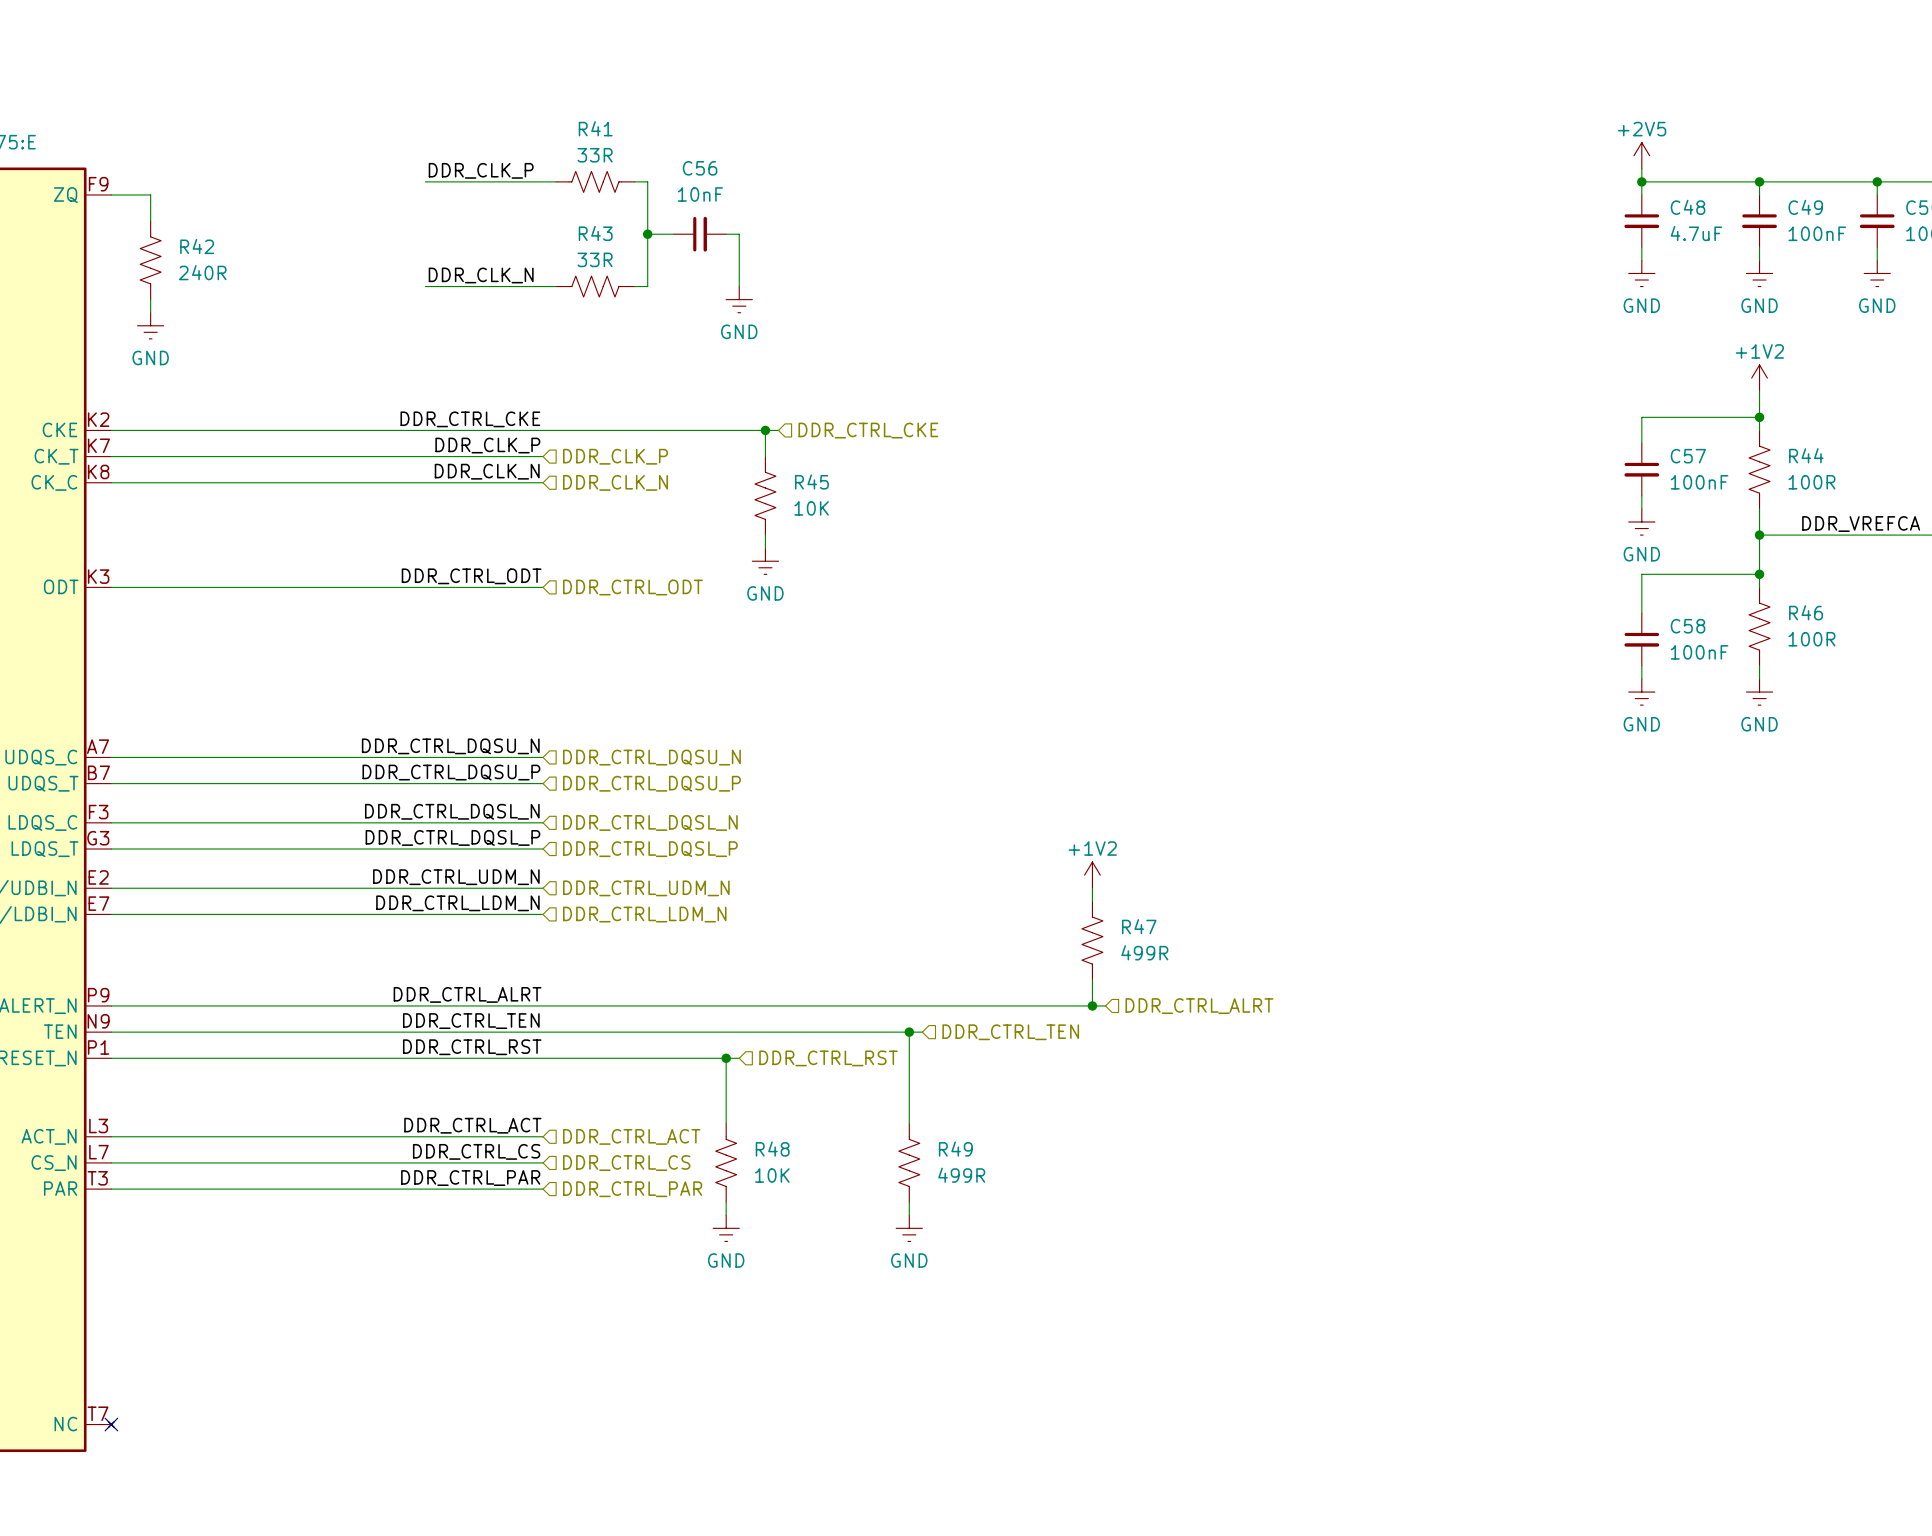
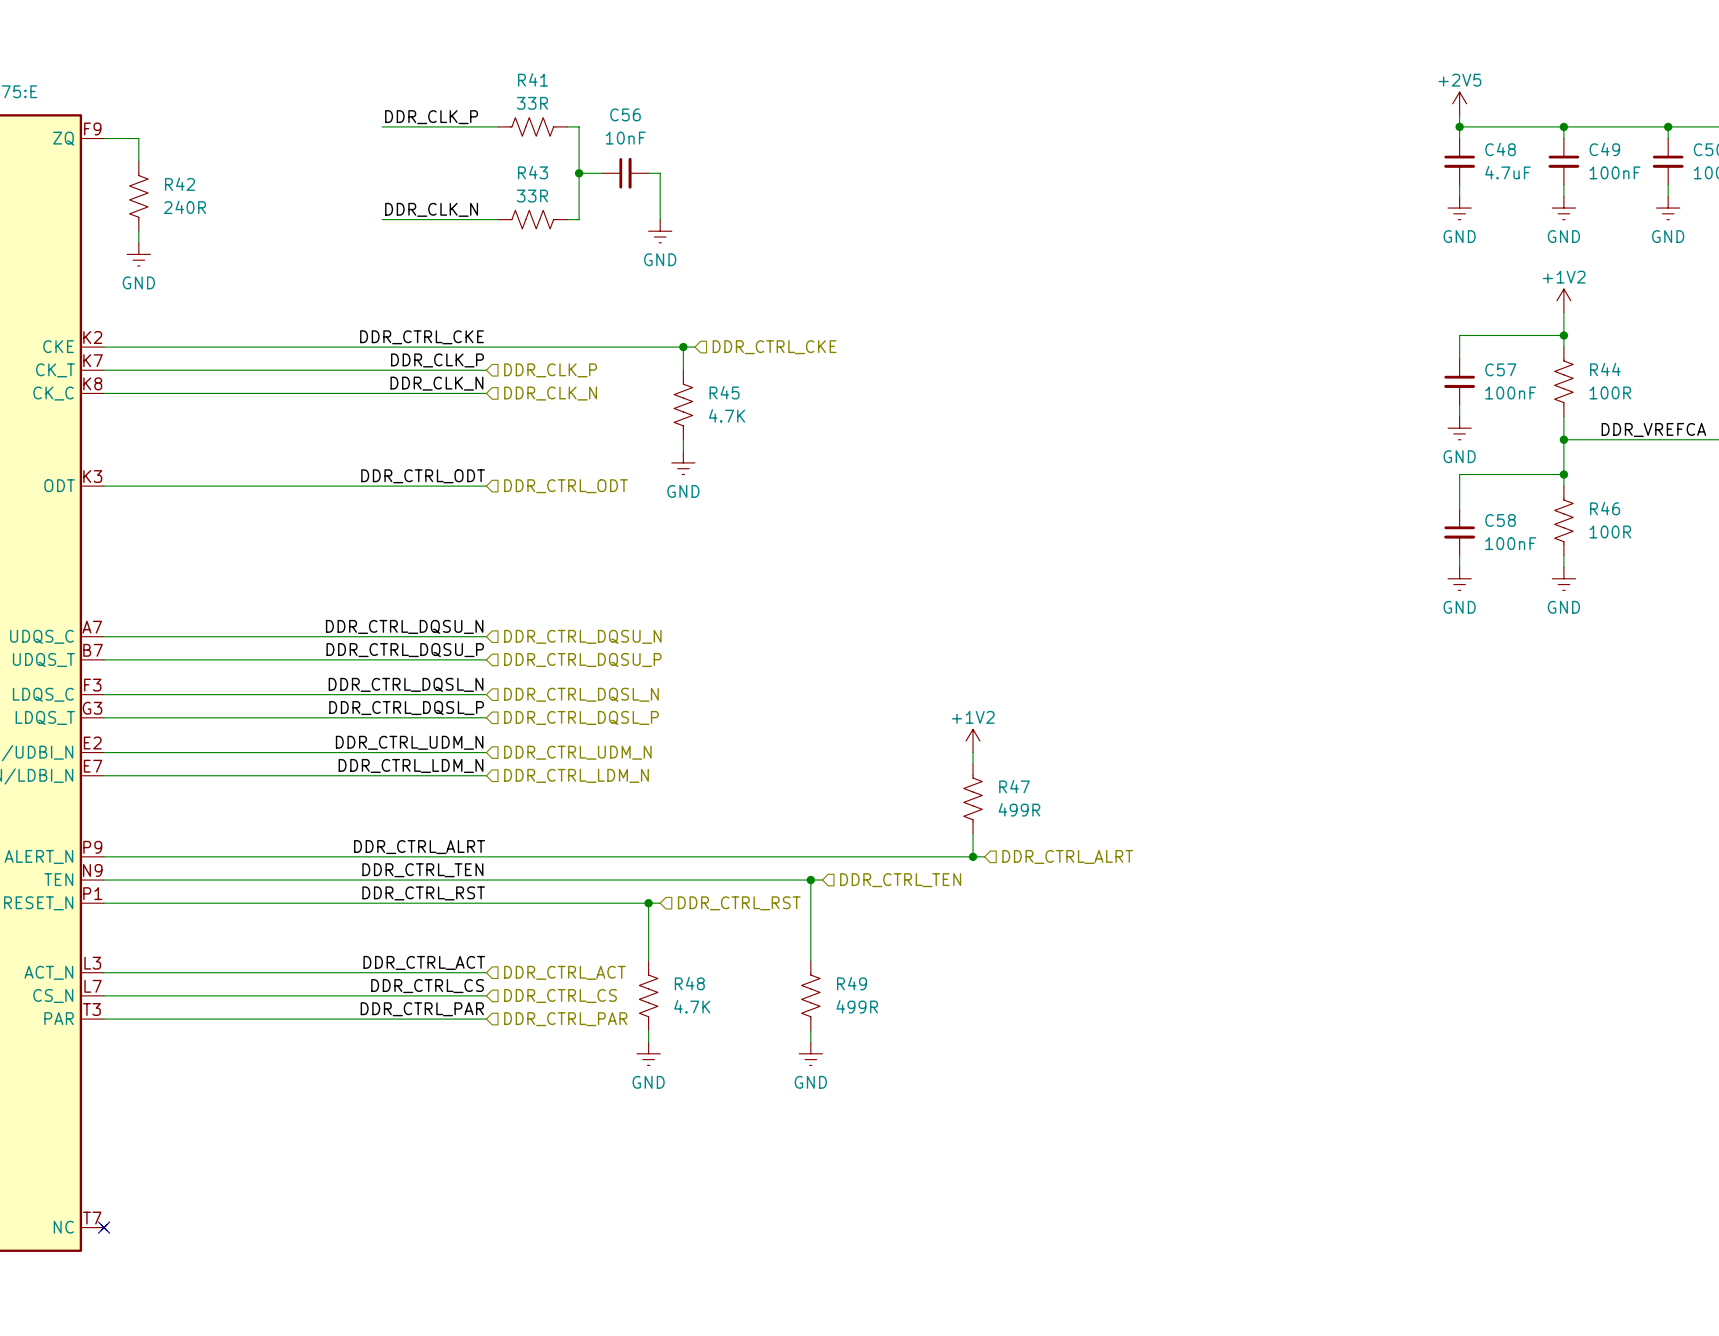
R45 value: 10K (811, 508) -> 4.7K (727, 415)
R48 value: 10K (772, 1175) -> 4.7K (692, 1006)

